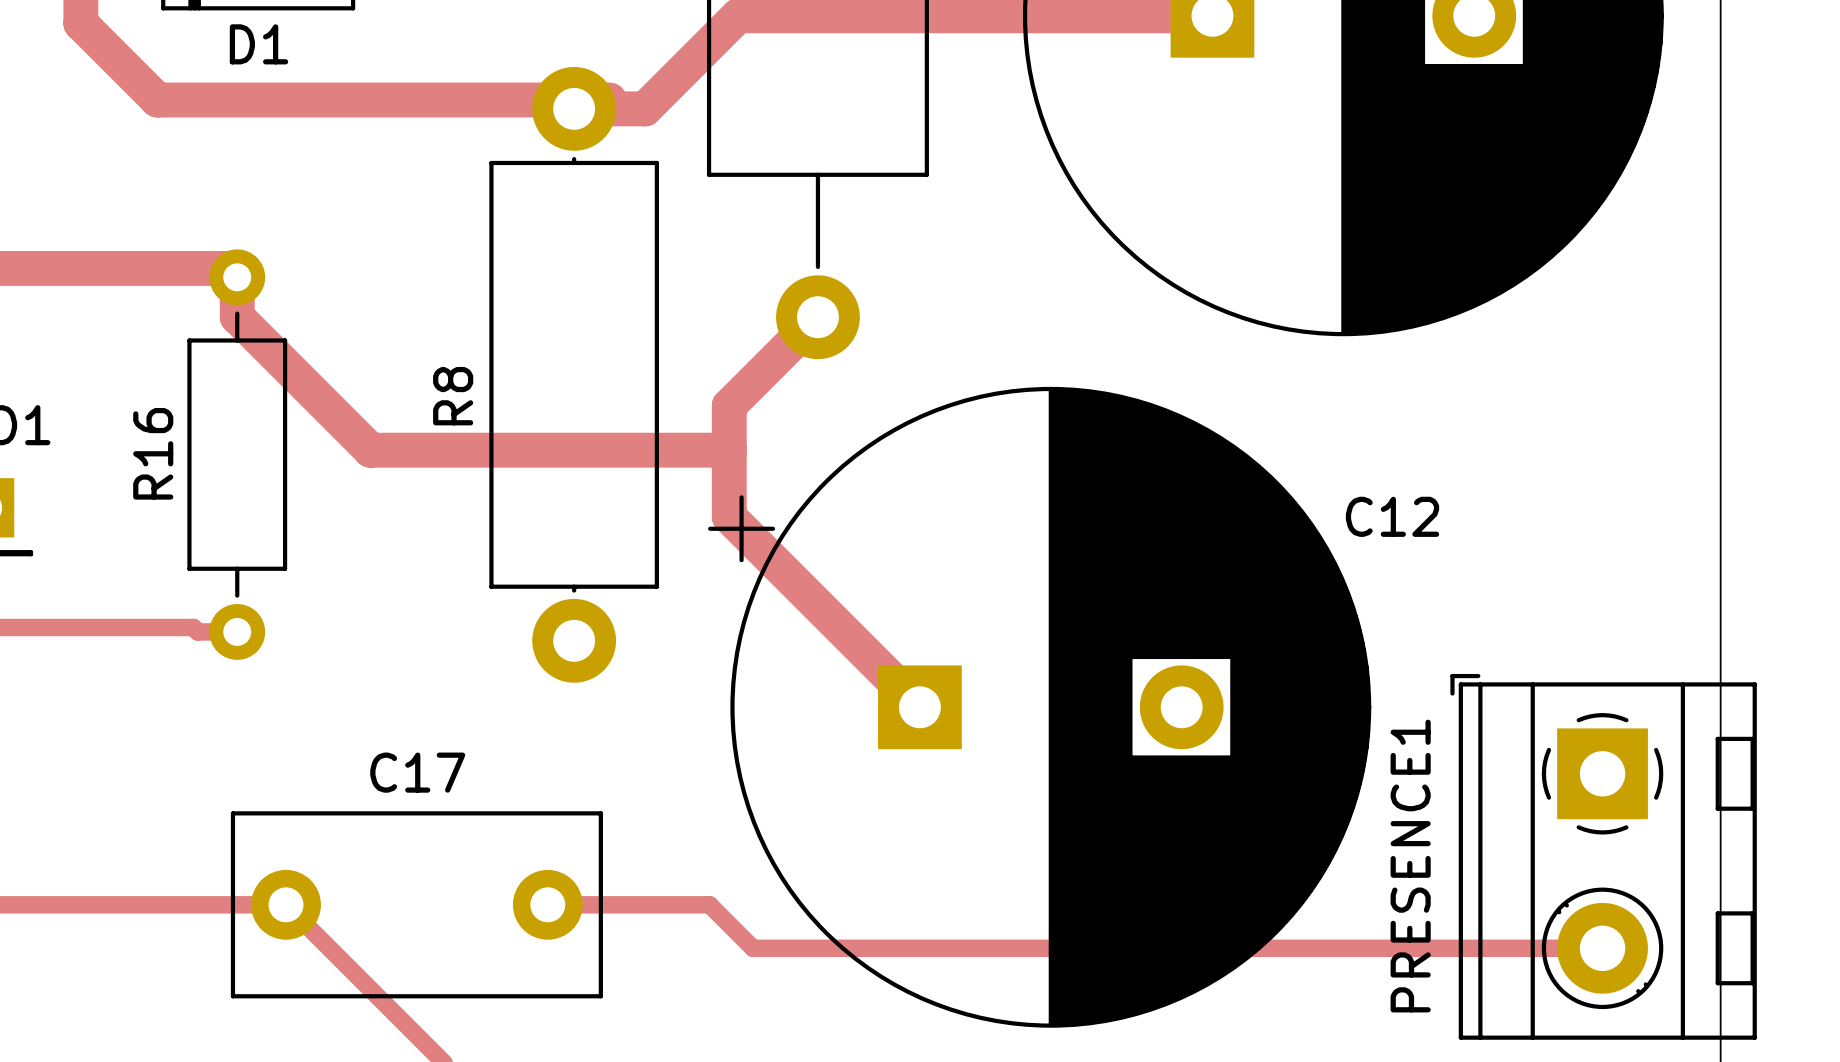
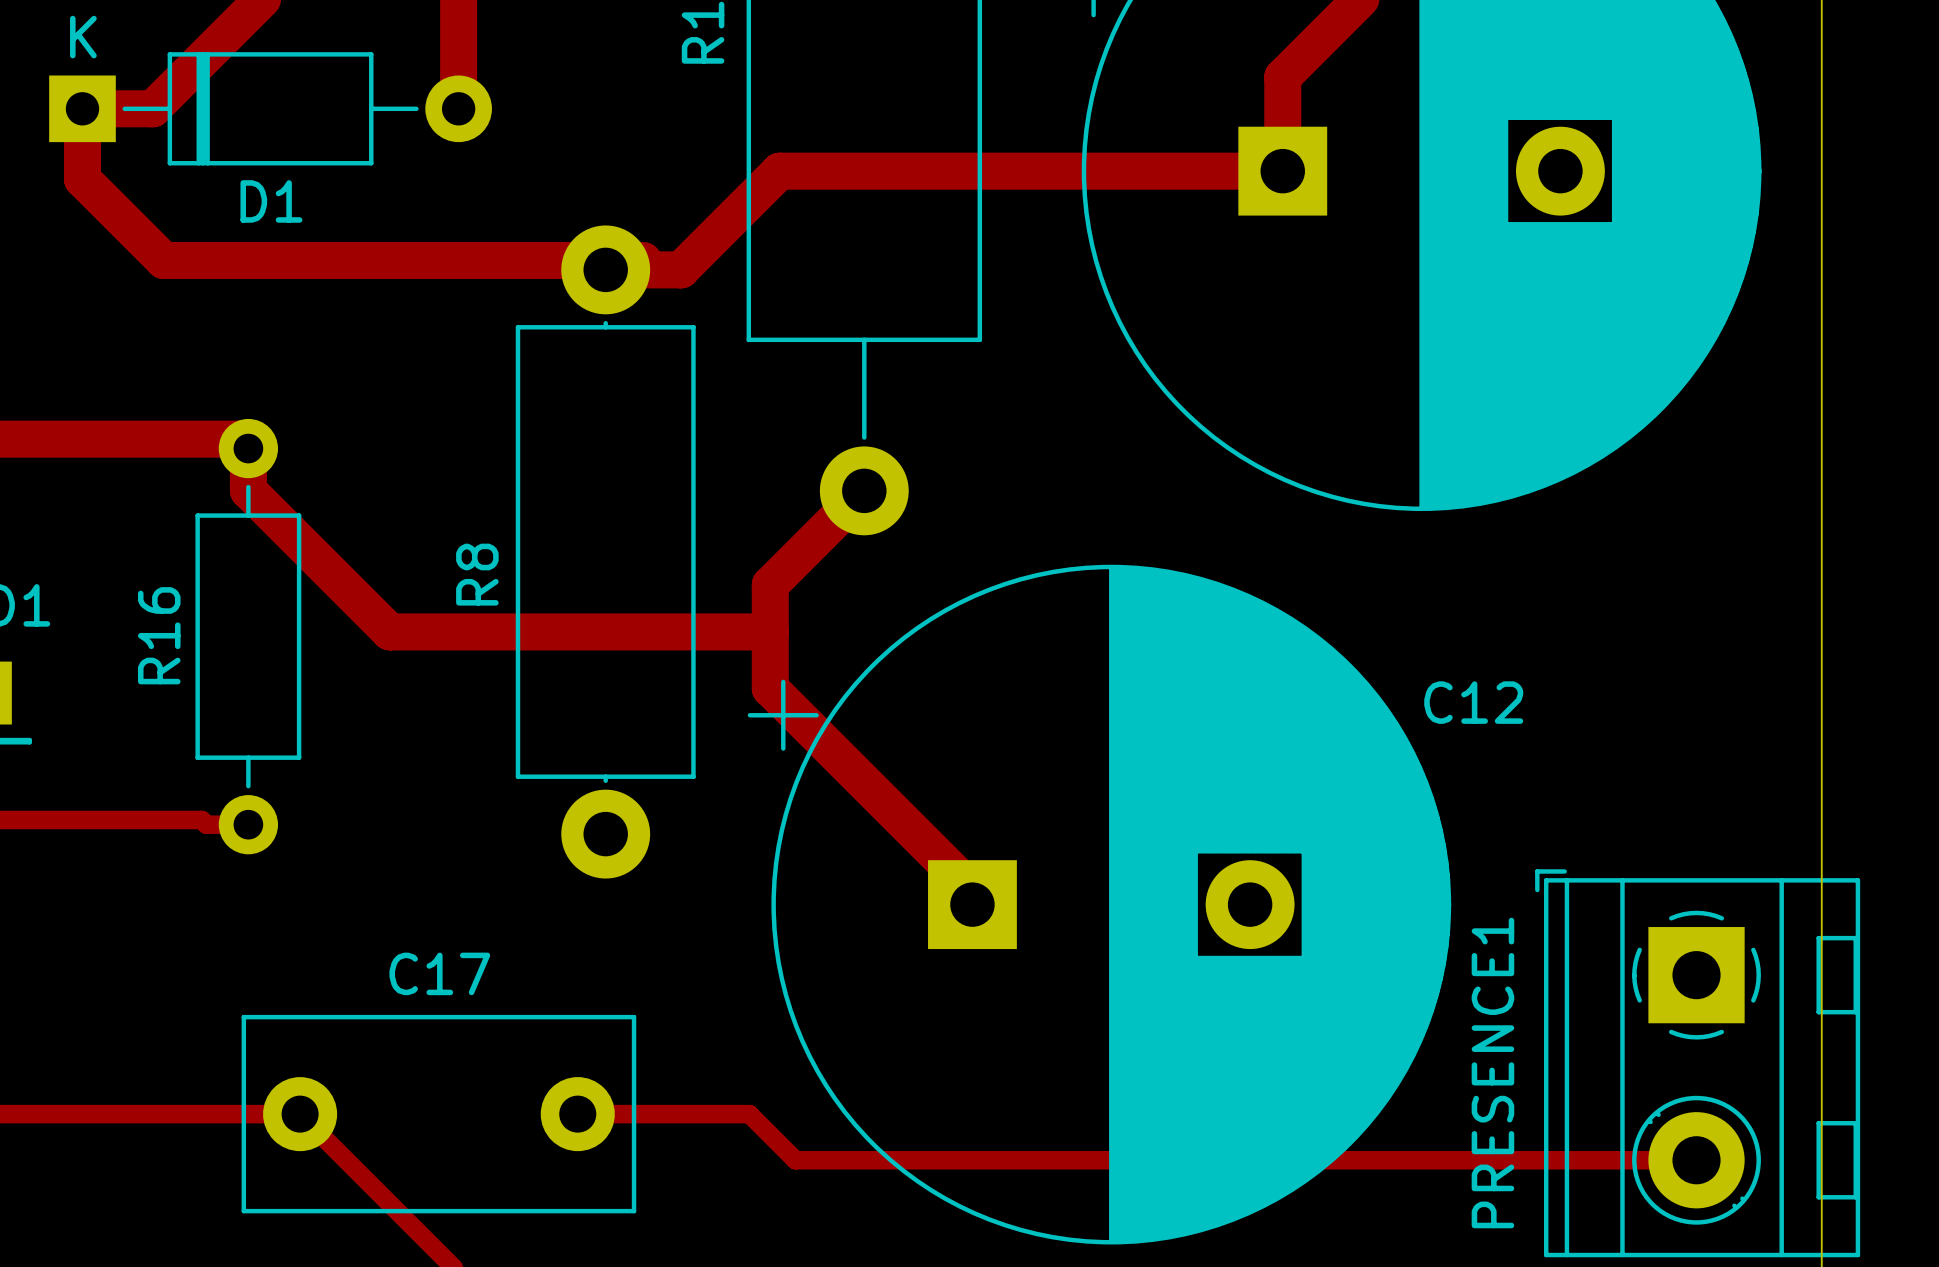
track: (729, 503) (729, 516) (919, 707) -> (770, 688) (972, 890)

